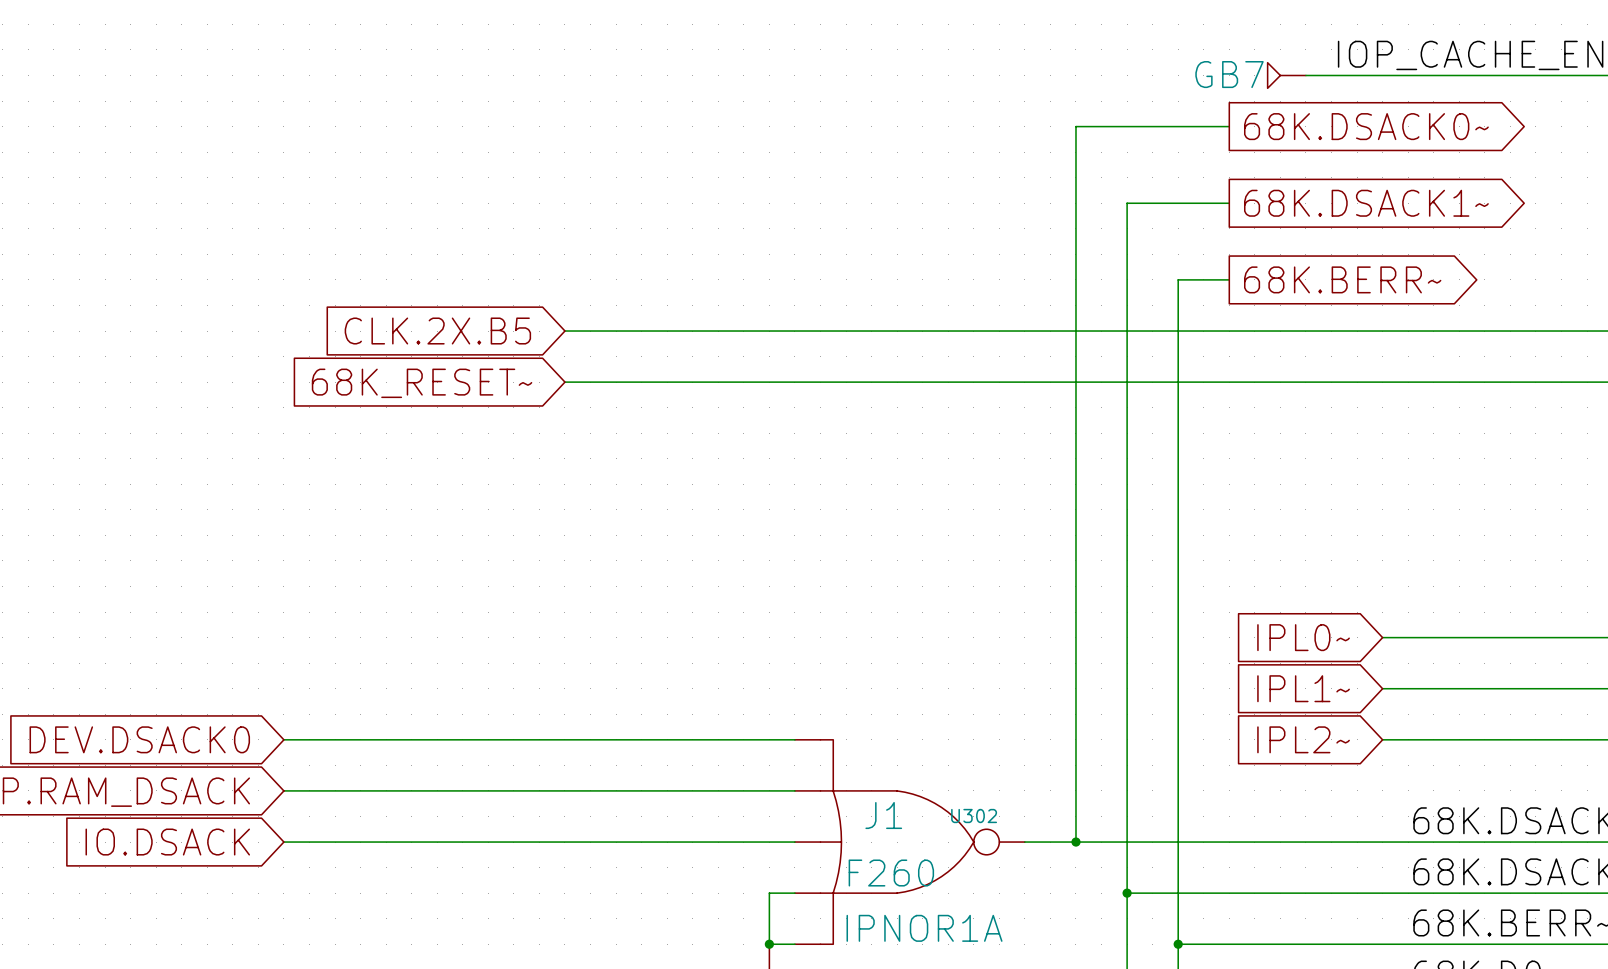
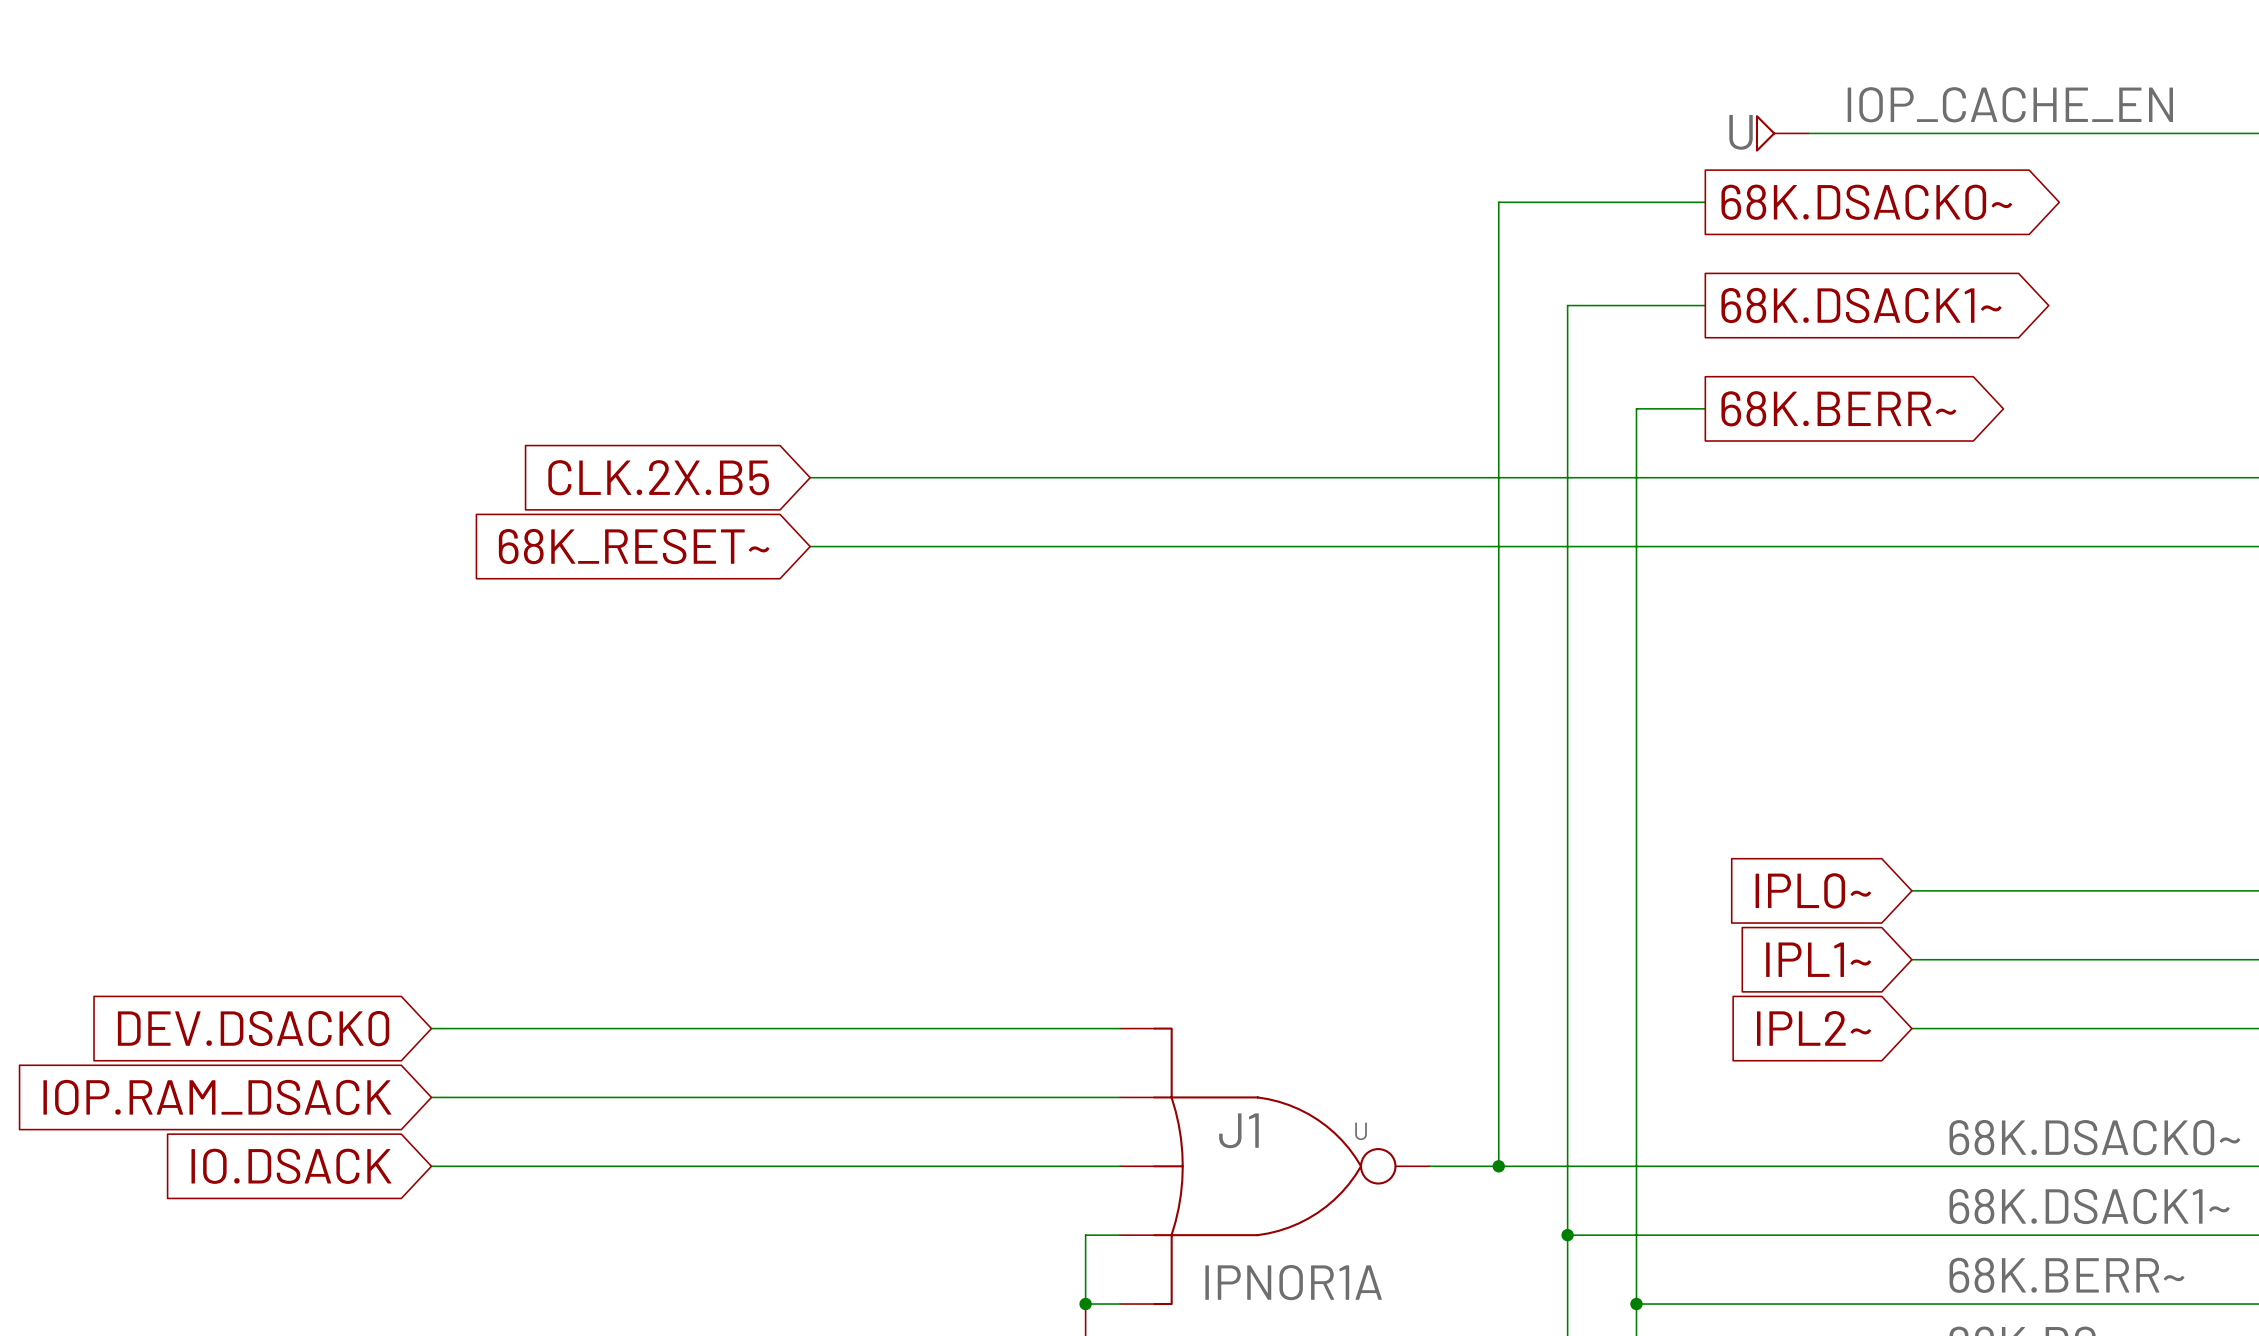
GB7 name: GB7 (1229, 74) -> U (1741, 132)
U302 name: U302 (974, 816) -> U (1361, 1131)
U302 value: F260 (891, 873) -> none

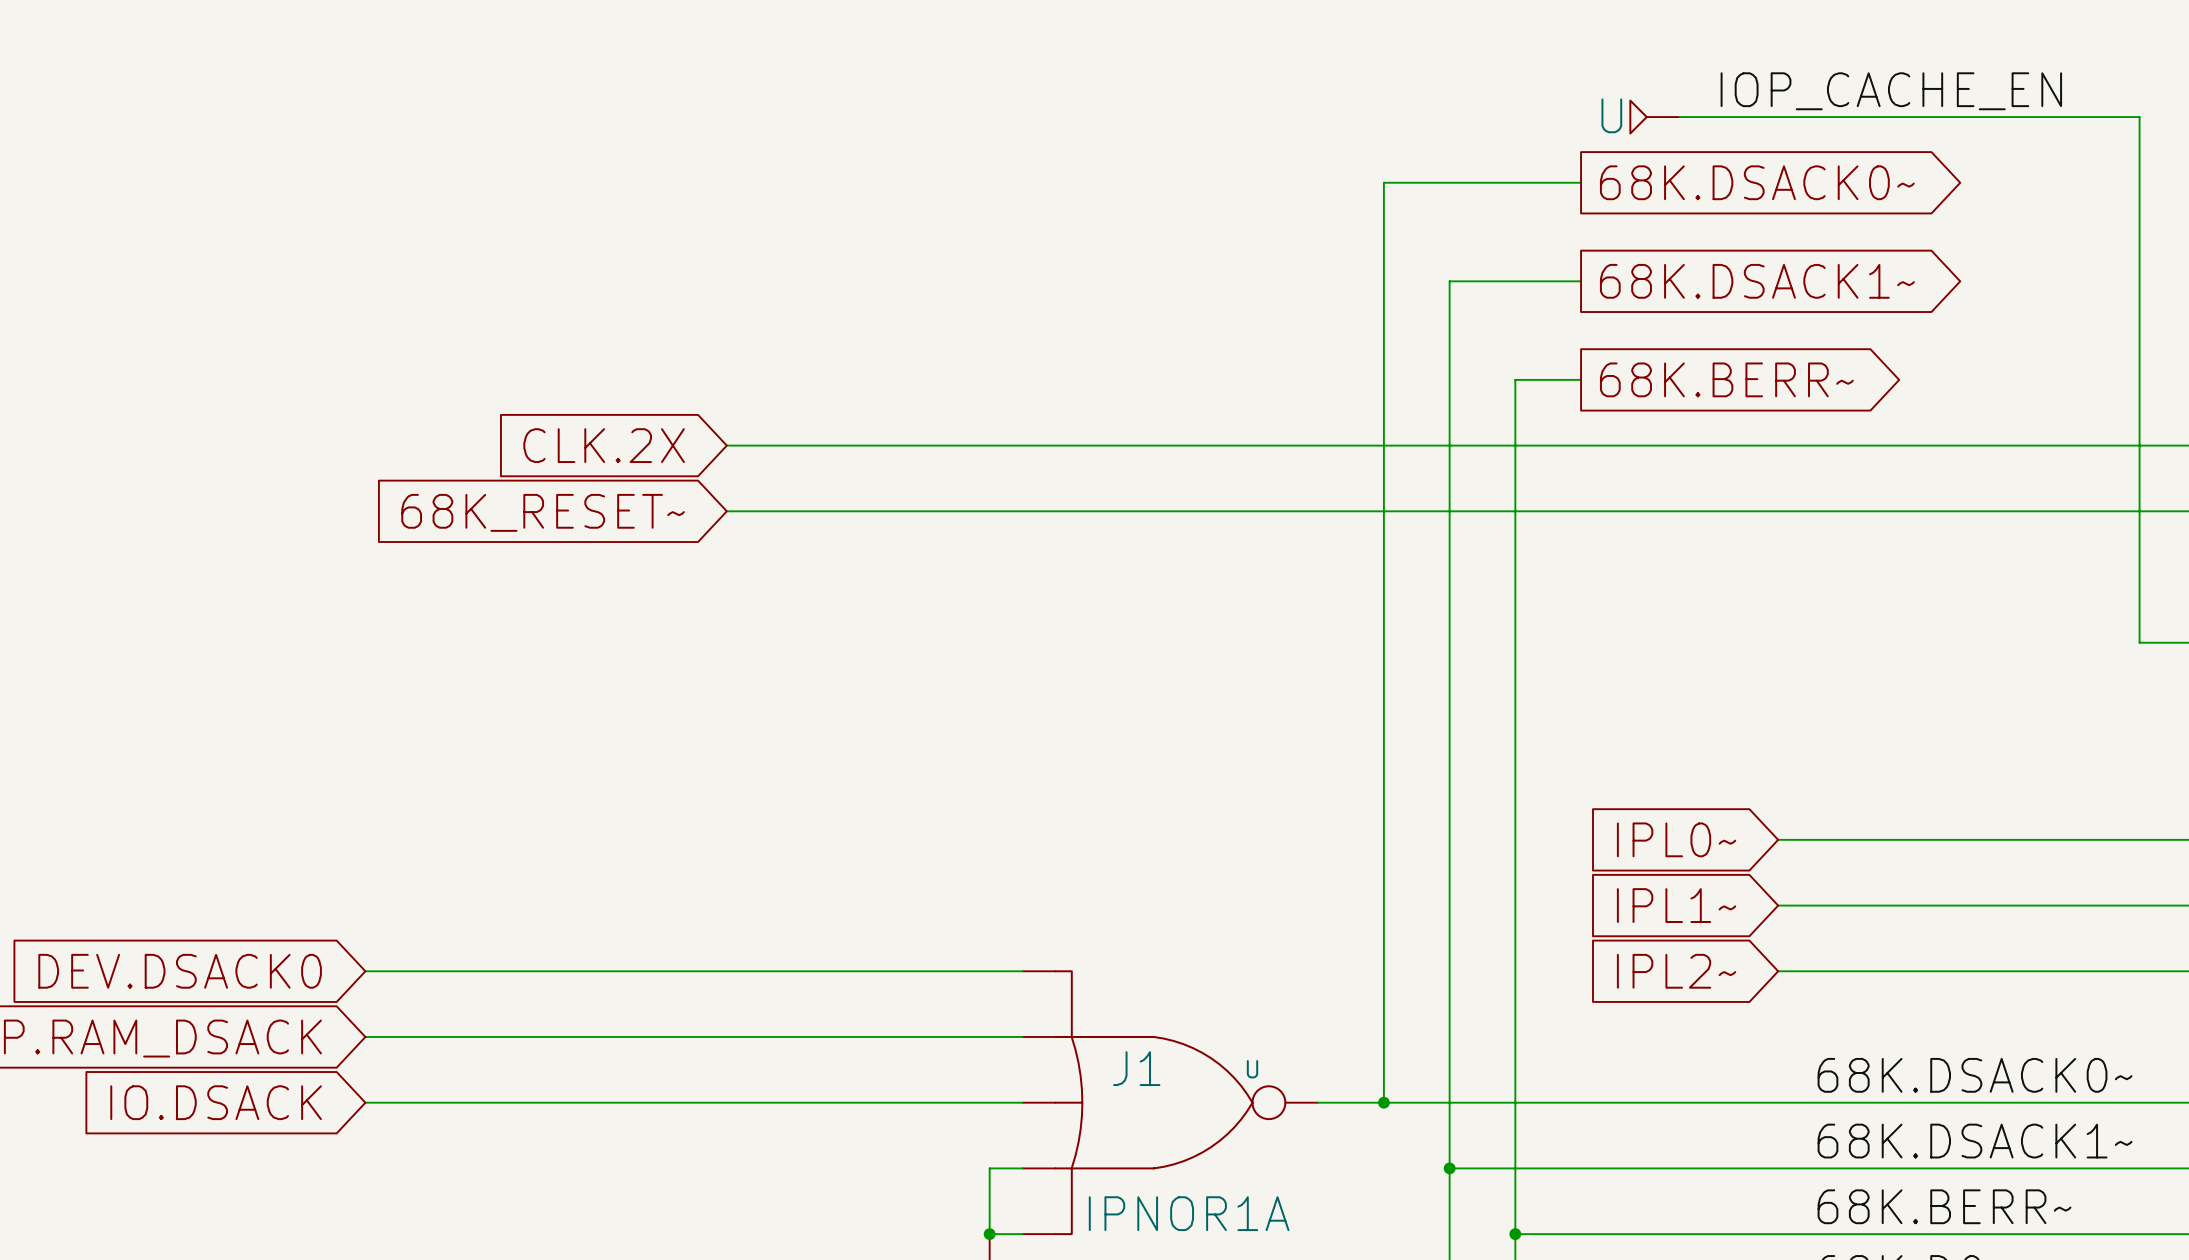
global label: CLK.2X.B5 (658, 477) -> CLK.2X (604, 445)

